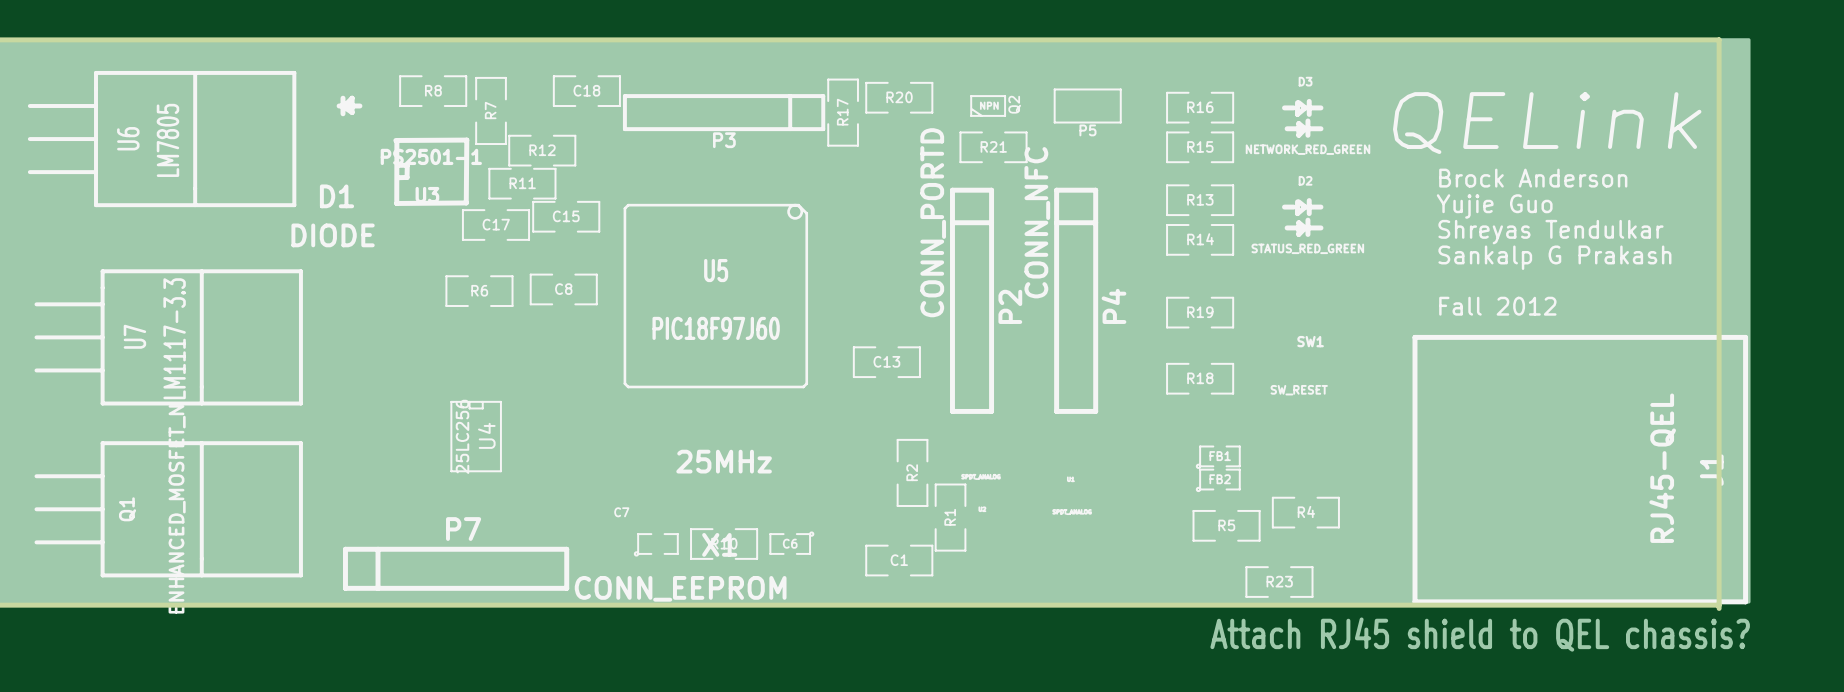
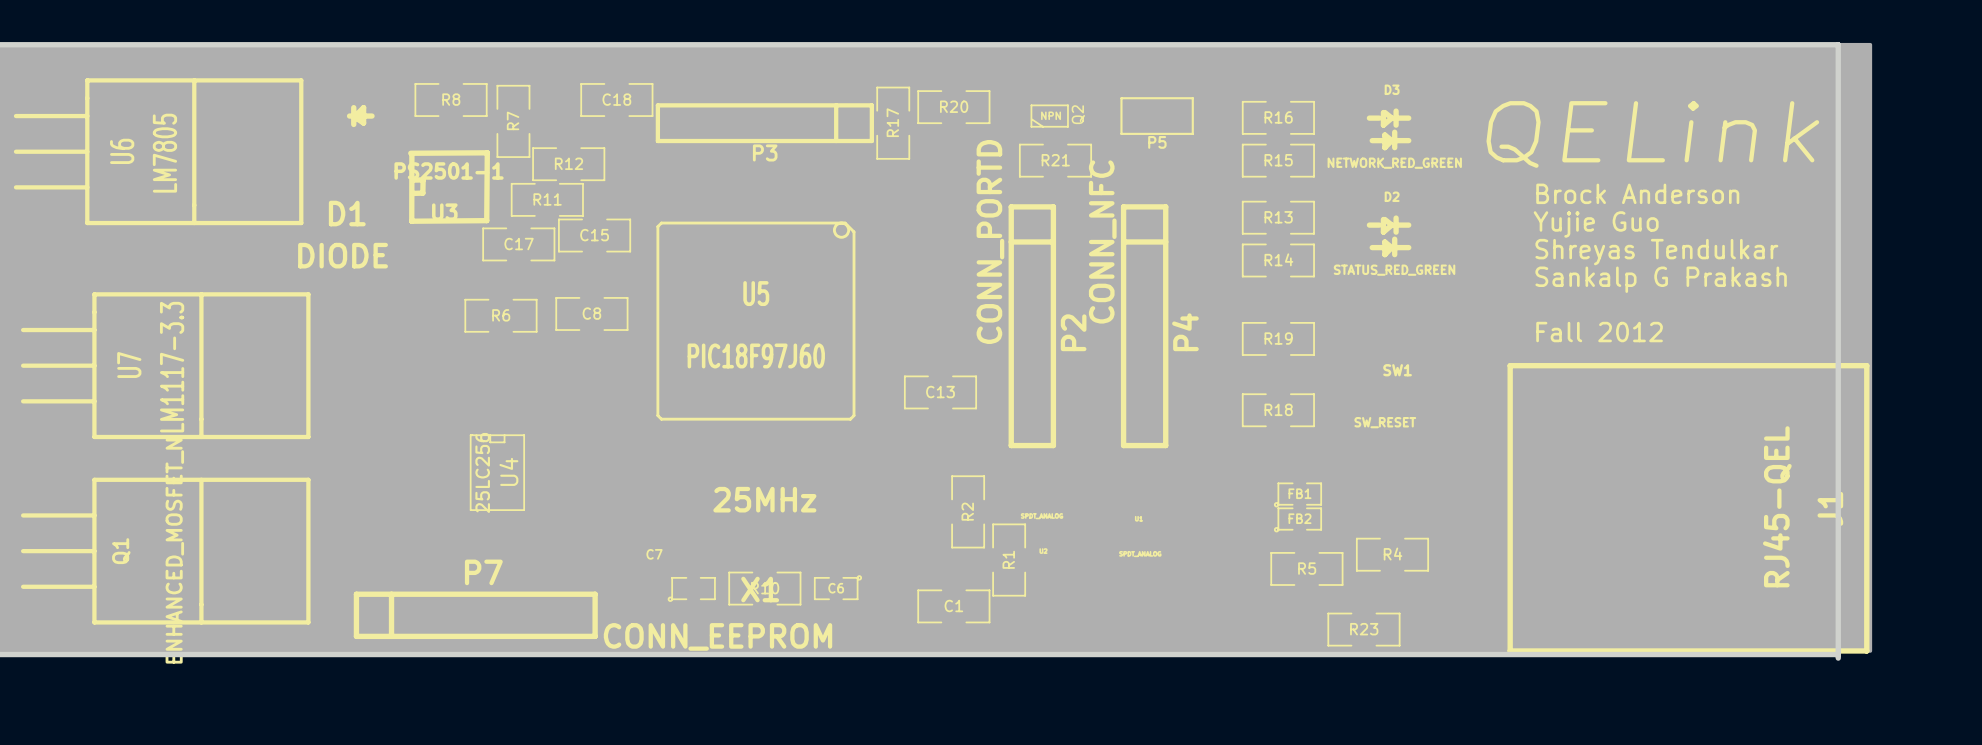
text: Attach RJ45 shield to QEL chassis? (1480, 634) -> none

